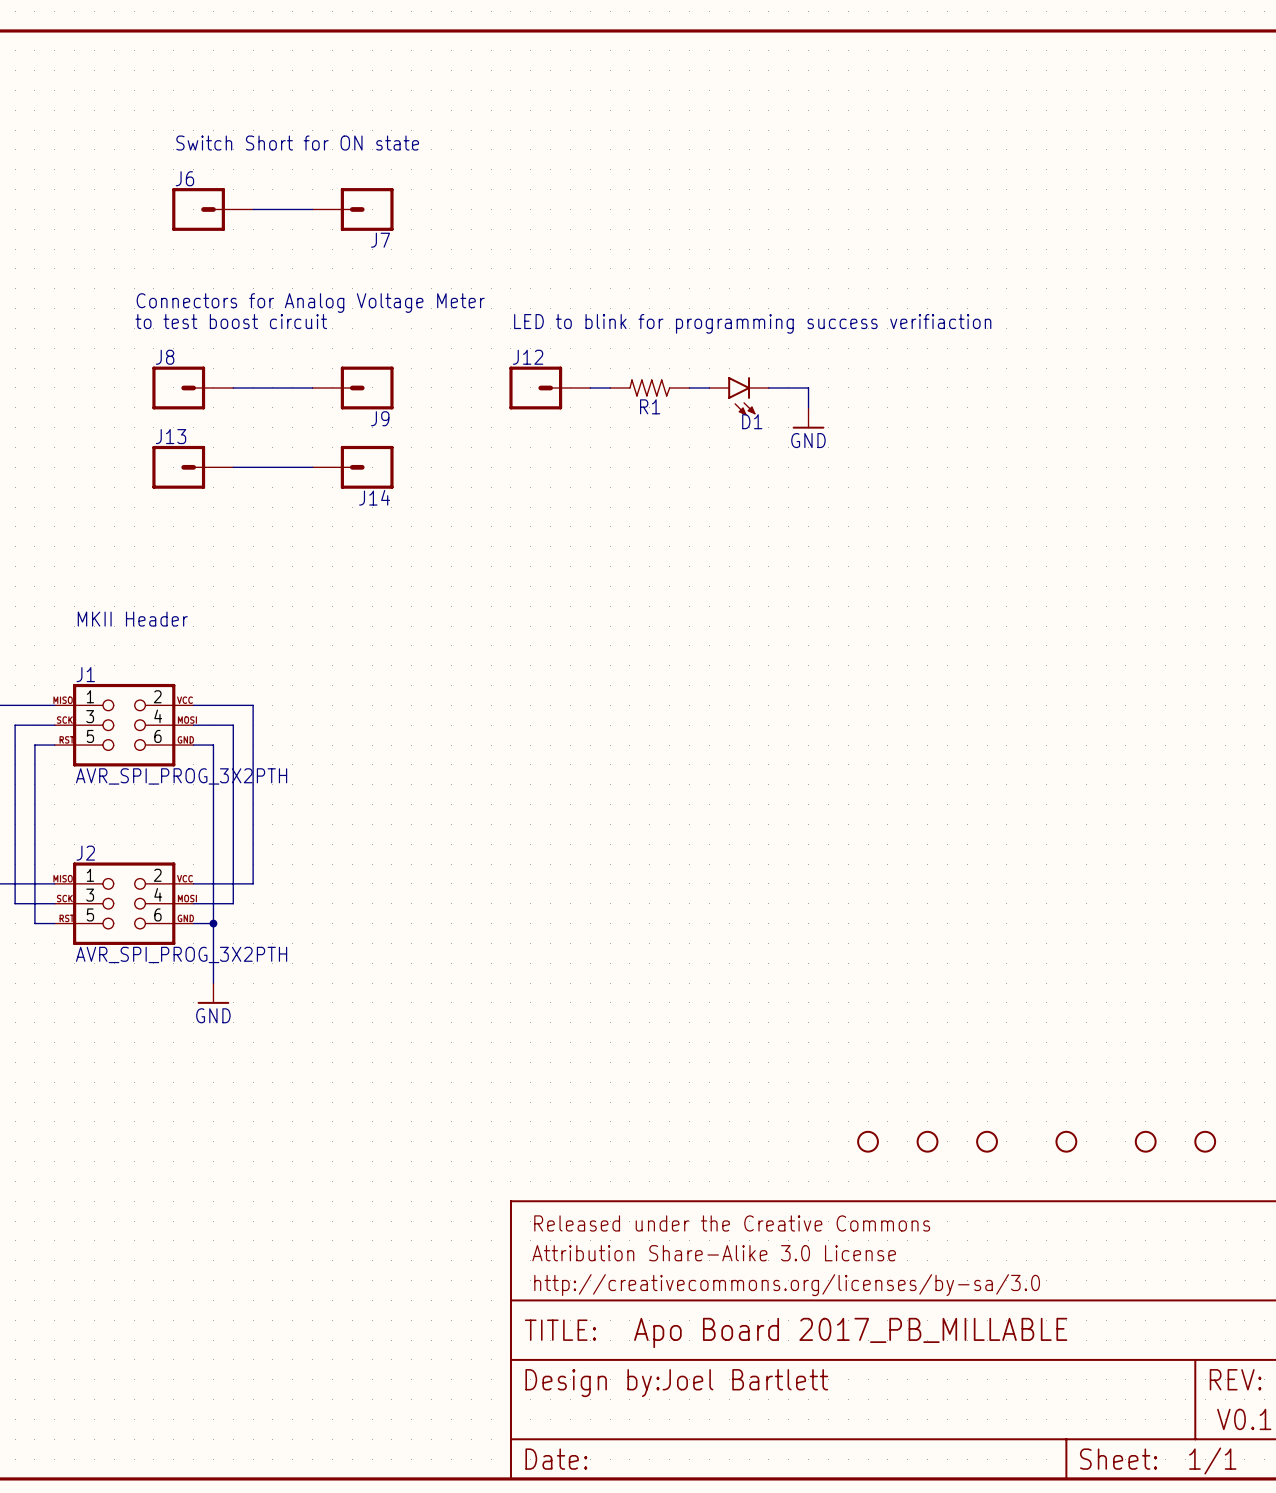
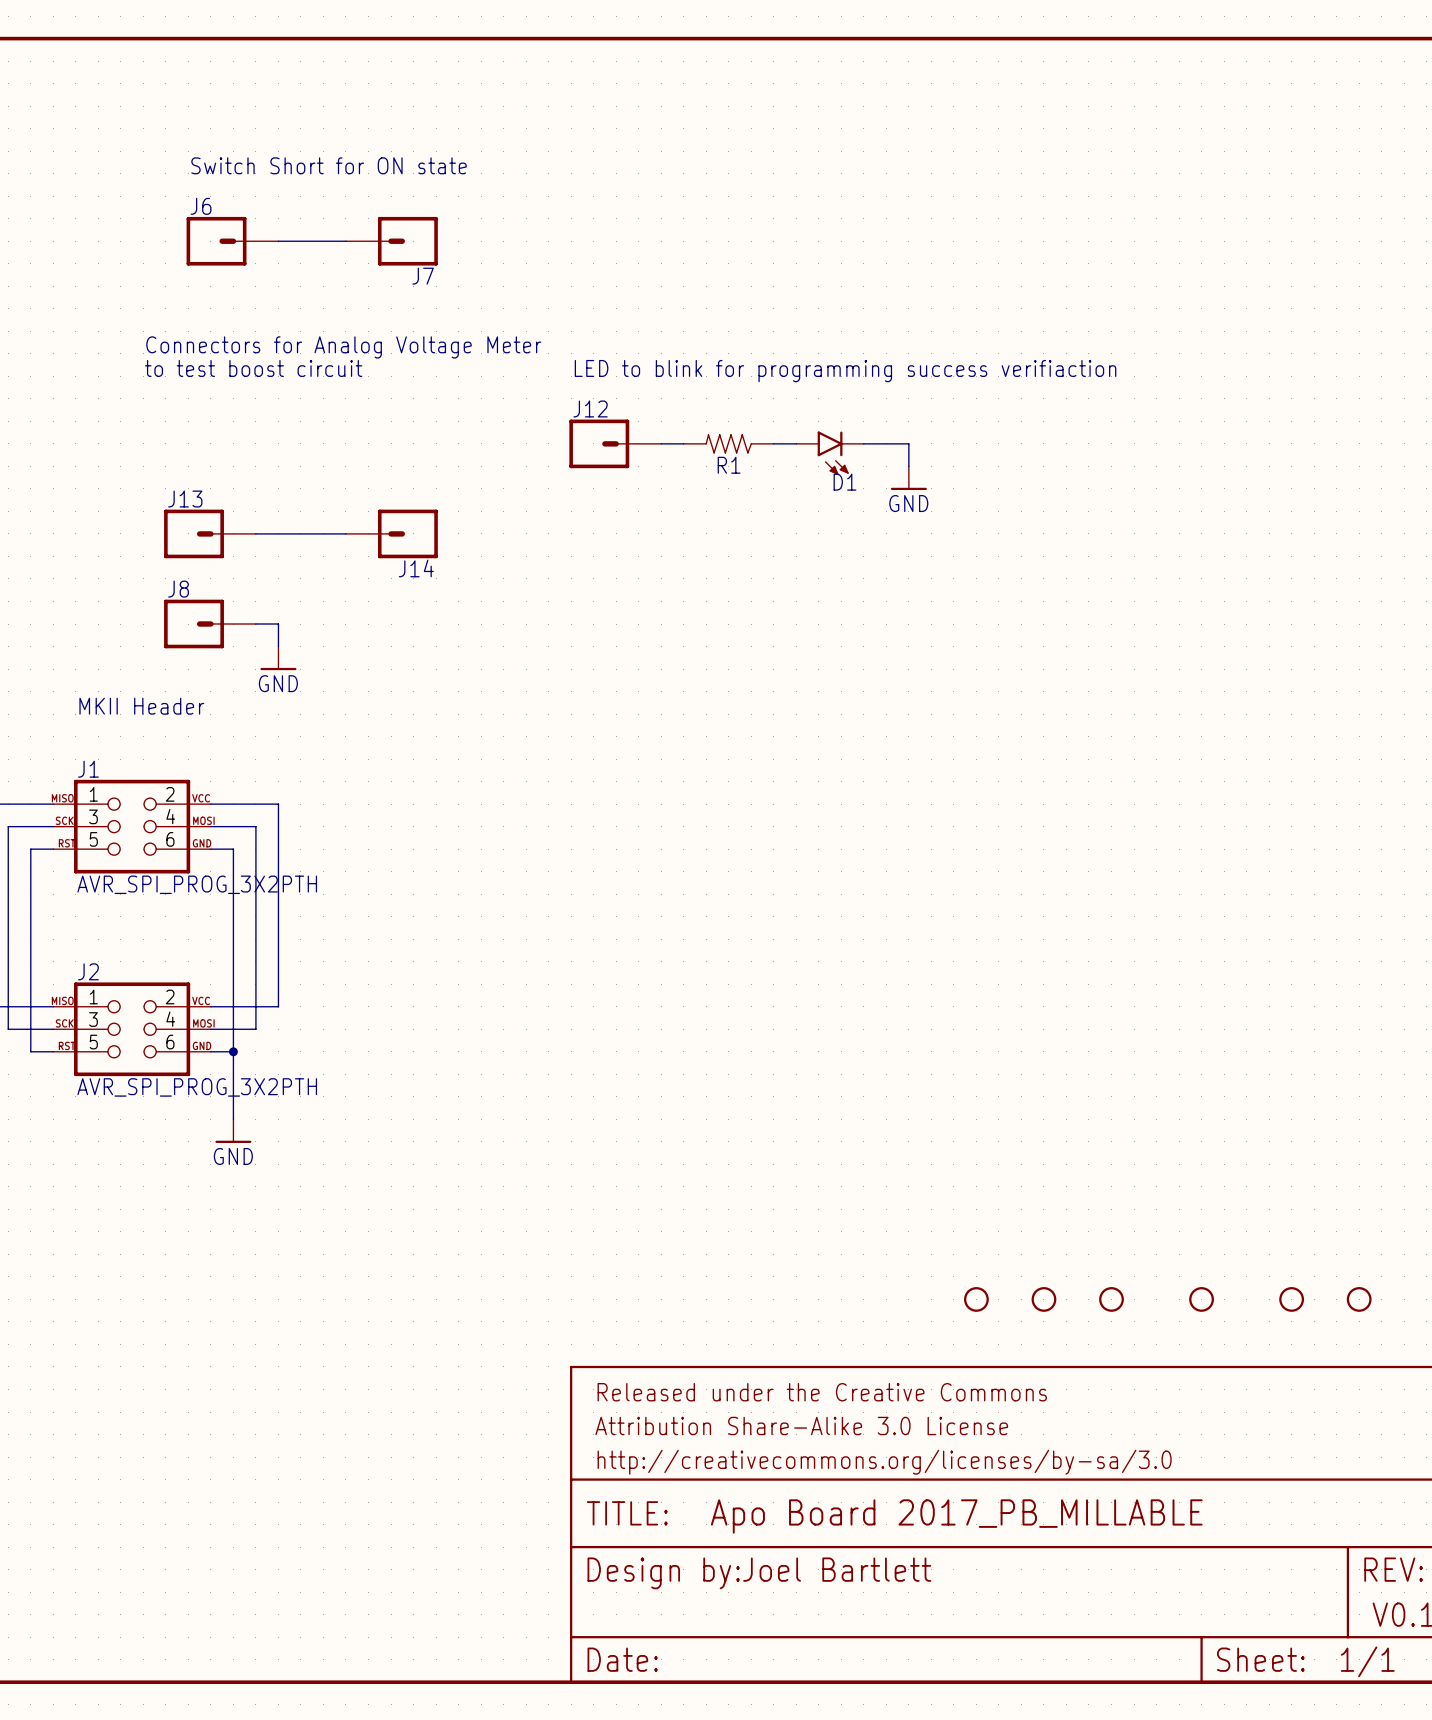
J8 position: (192, 387) -> (210, 624)
wire: (233, 387) (312, 387) -> none
J9: (353, 387) -> none
wire: none -> (255, 624) (278, 624) (278, 646)
power symbol: none -> GND (278, 658)

